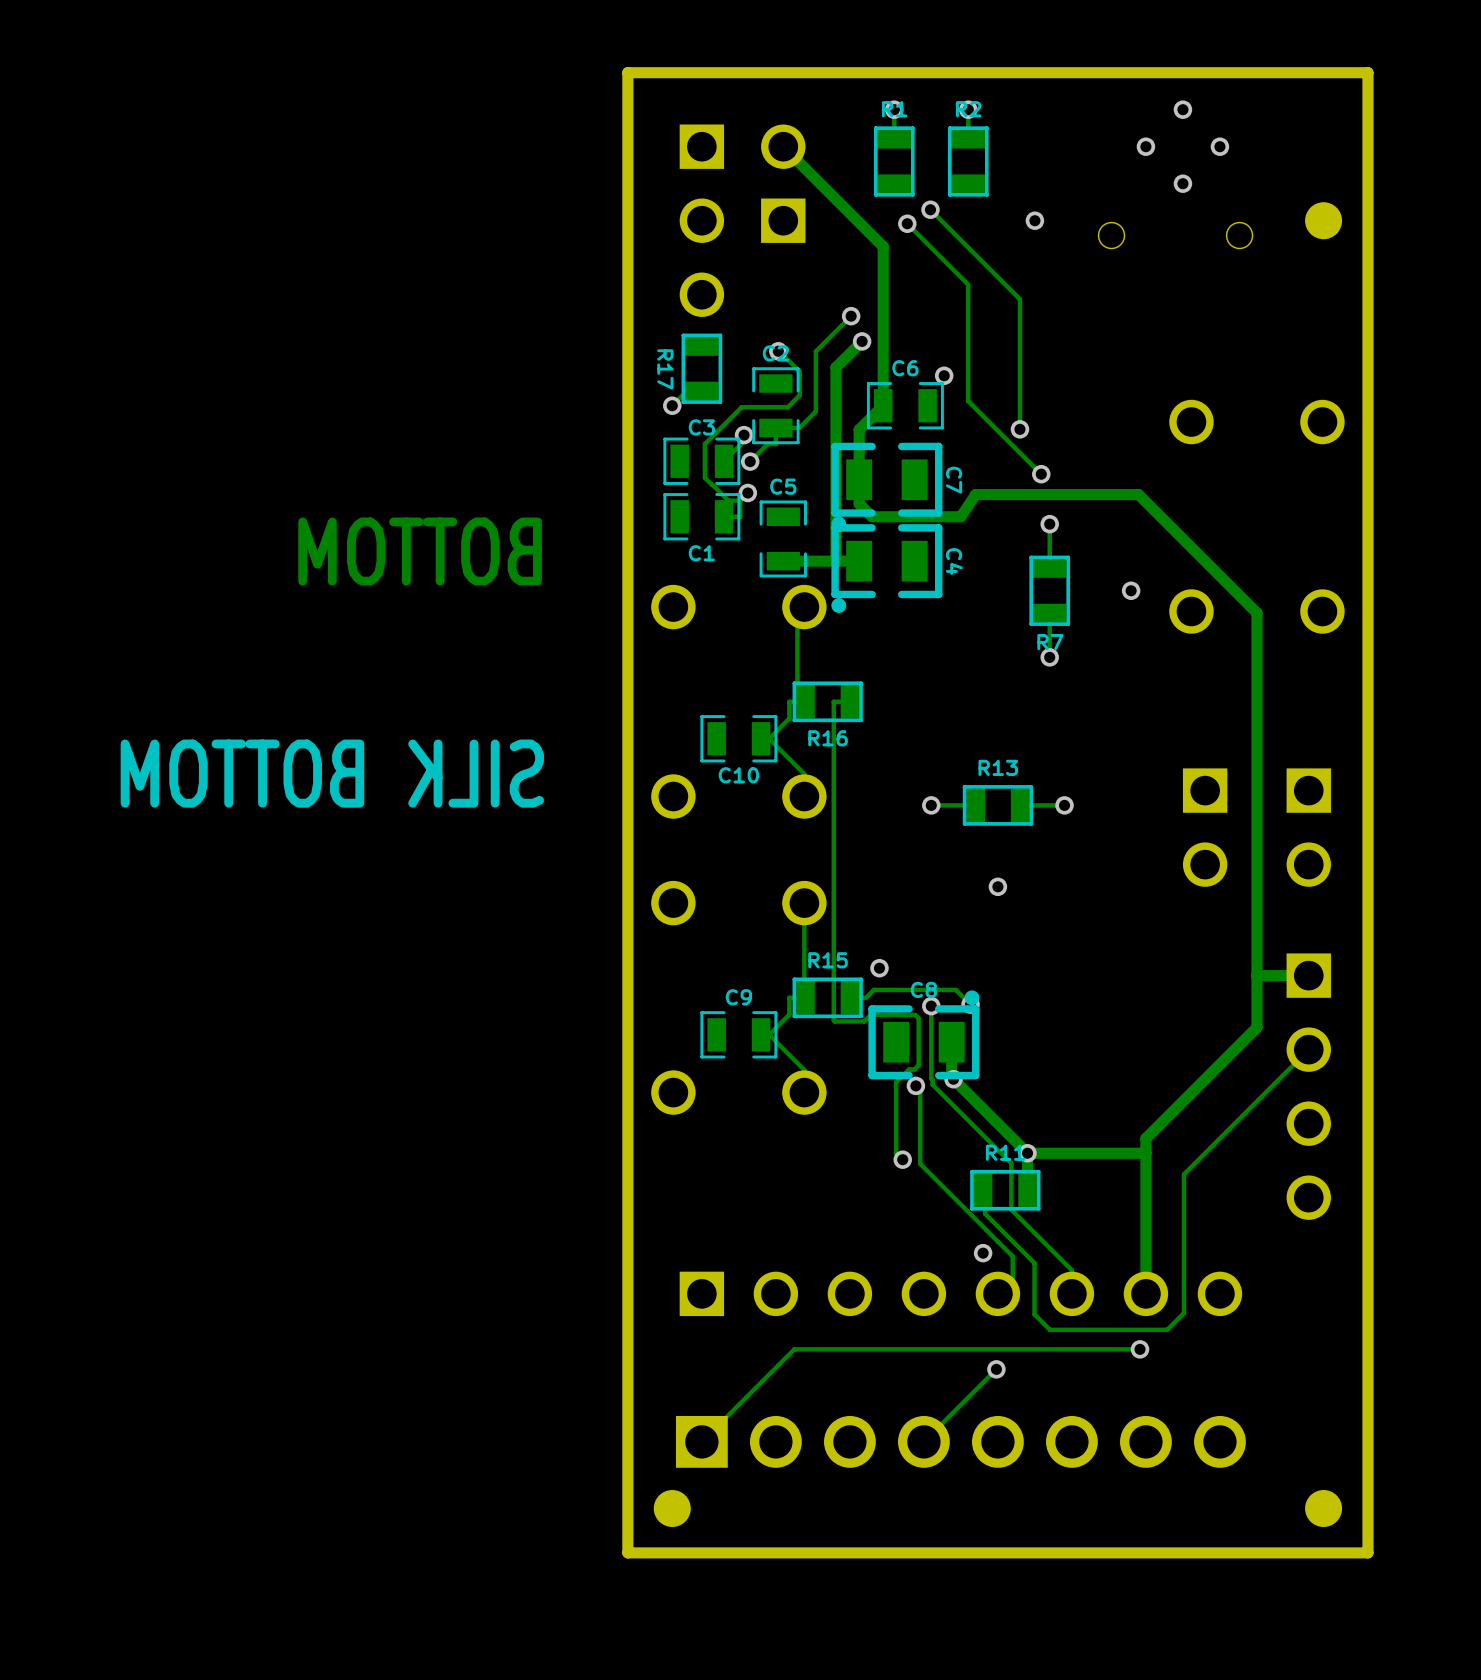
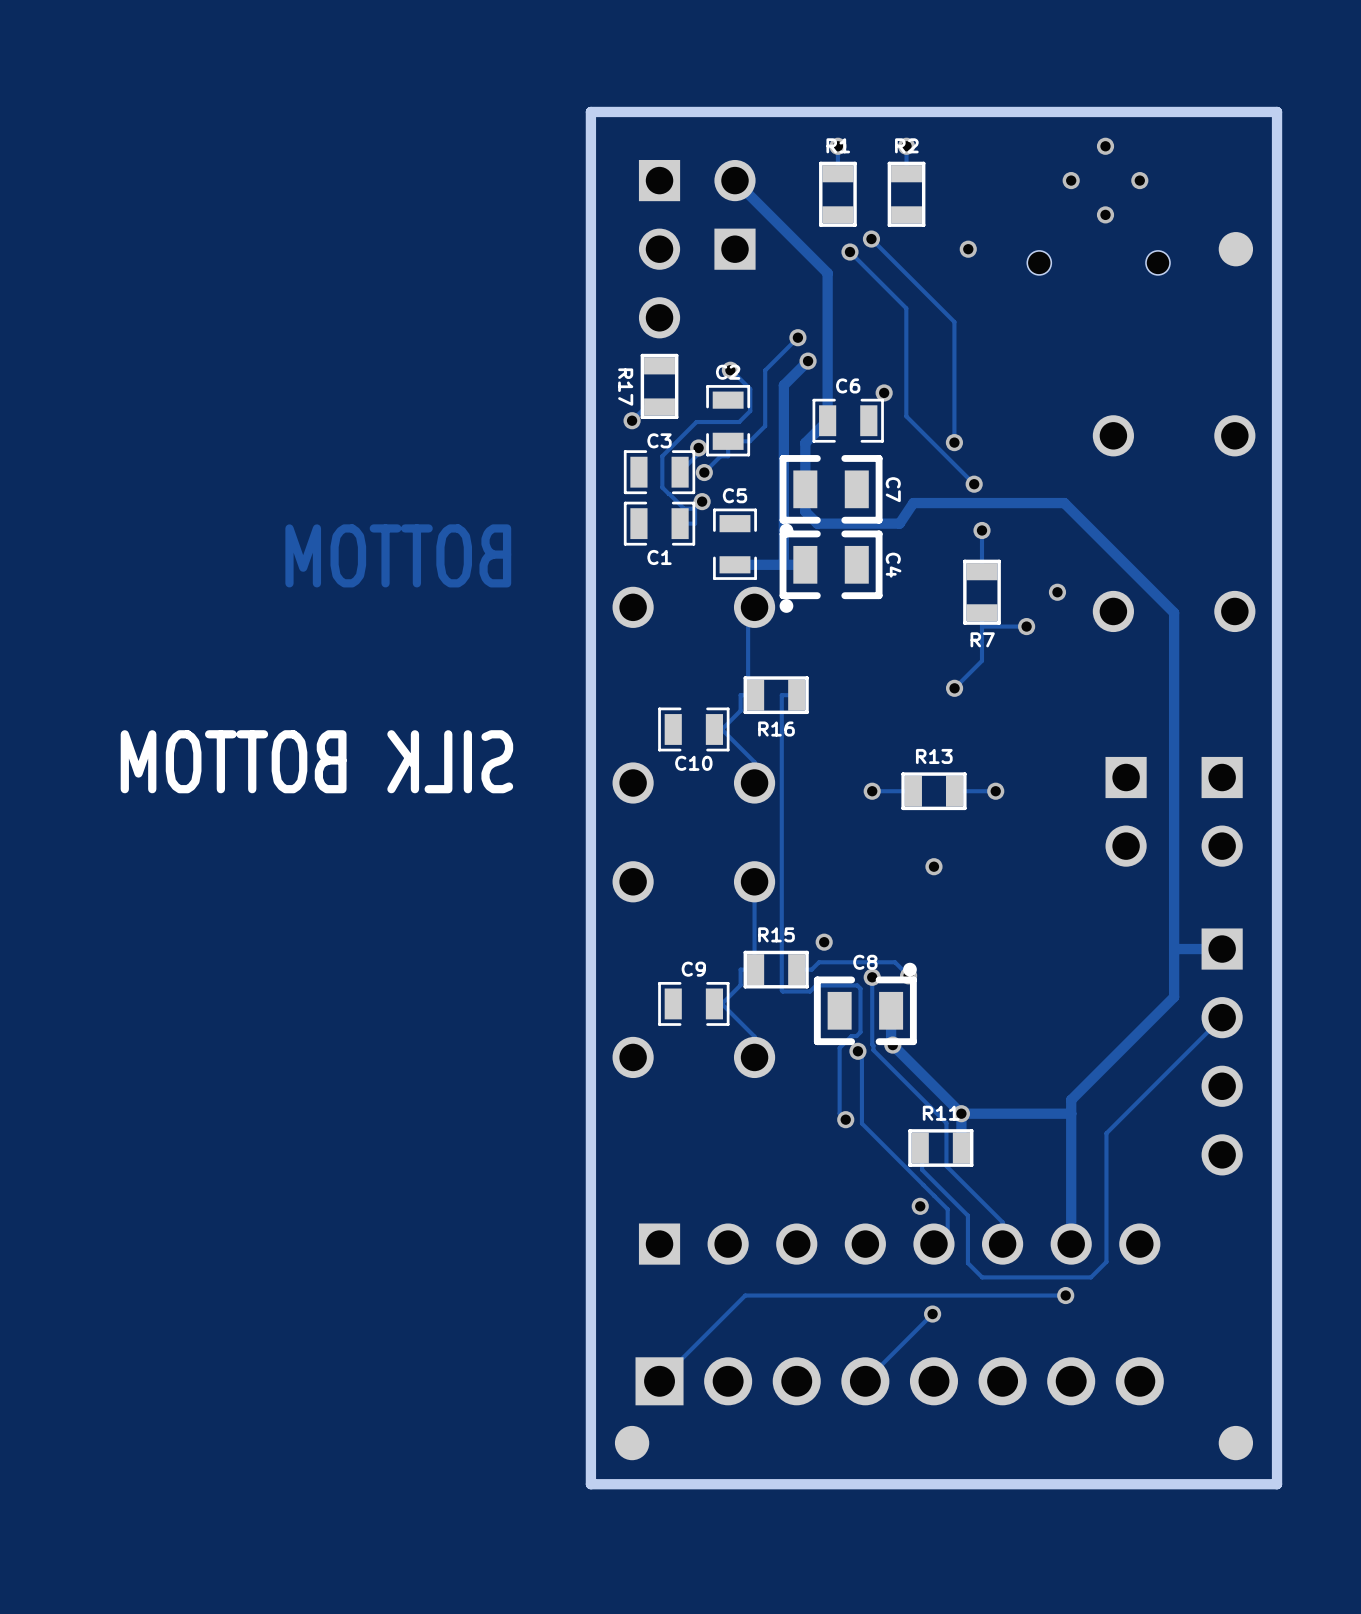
track: none -> (1026, 626) (982, 626)
via: none -> (1026, 626)
track: none -> (982, 654) (982, 660) (954, 688)
via: (1049, 657) -> none
via: none -> (954, 688)

